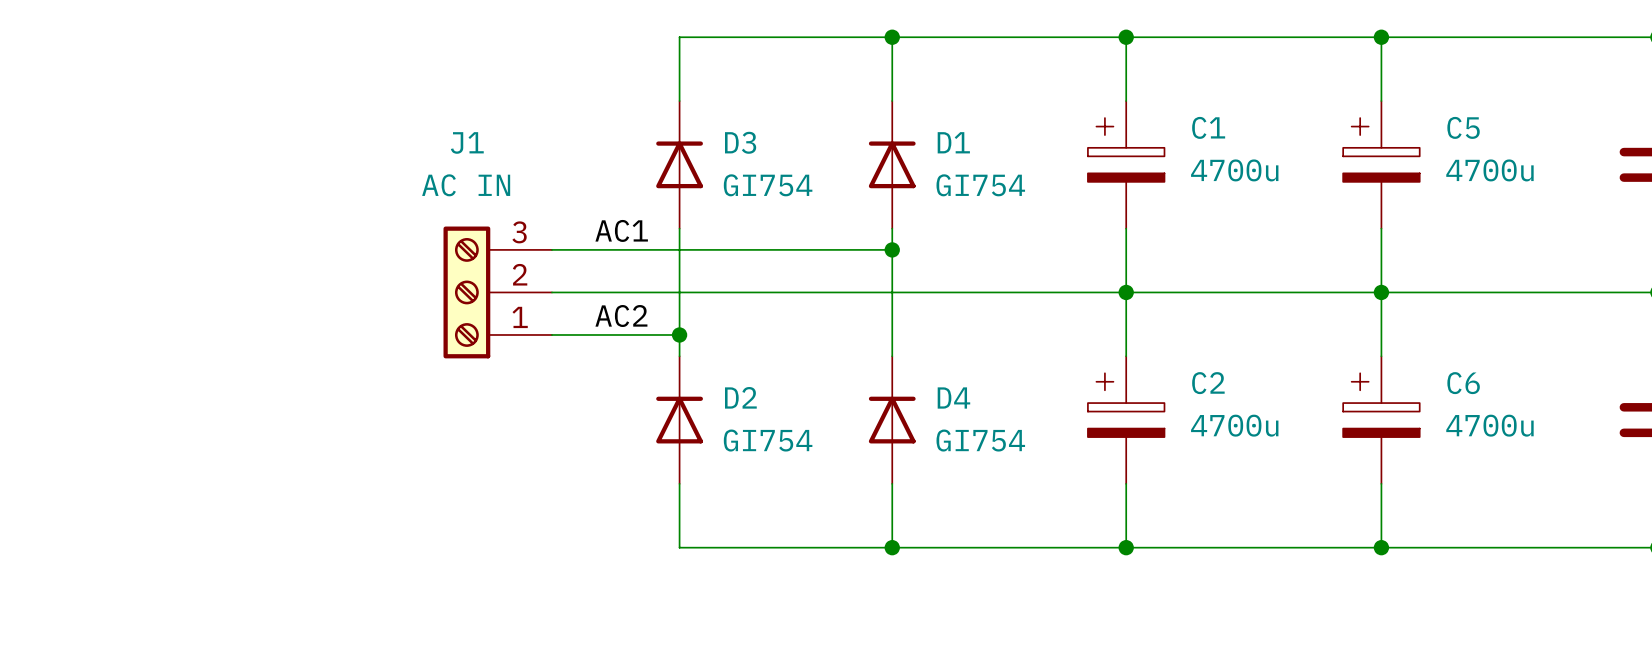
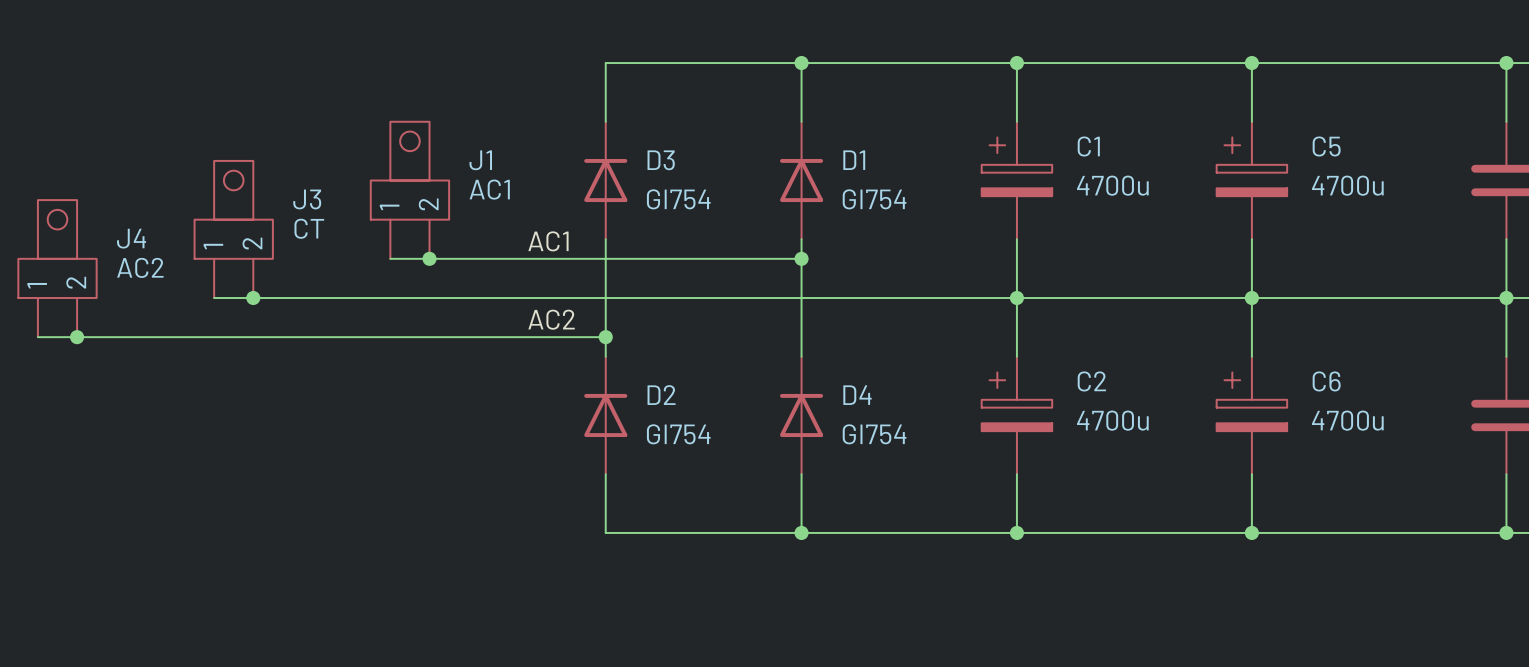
J1 name position: J1 (467, 142) -> J1 (480, 160)
J1 value: AC IN (466, 185) -> AC1 (489, 189)
J3: none -> CT (233, 229)
J1 symbol: [443, 226, 552, 359] -> [370, 121, 450, 259]
junction: none -> (429, 258)
J4: none -> AC2 (57, 268)
wire: none -> (214, 297) (488, 297)
junction: none -> (253, 297)
wire: none -> (37, 337) (488, 337)
junction: none -> (77, 337)

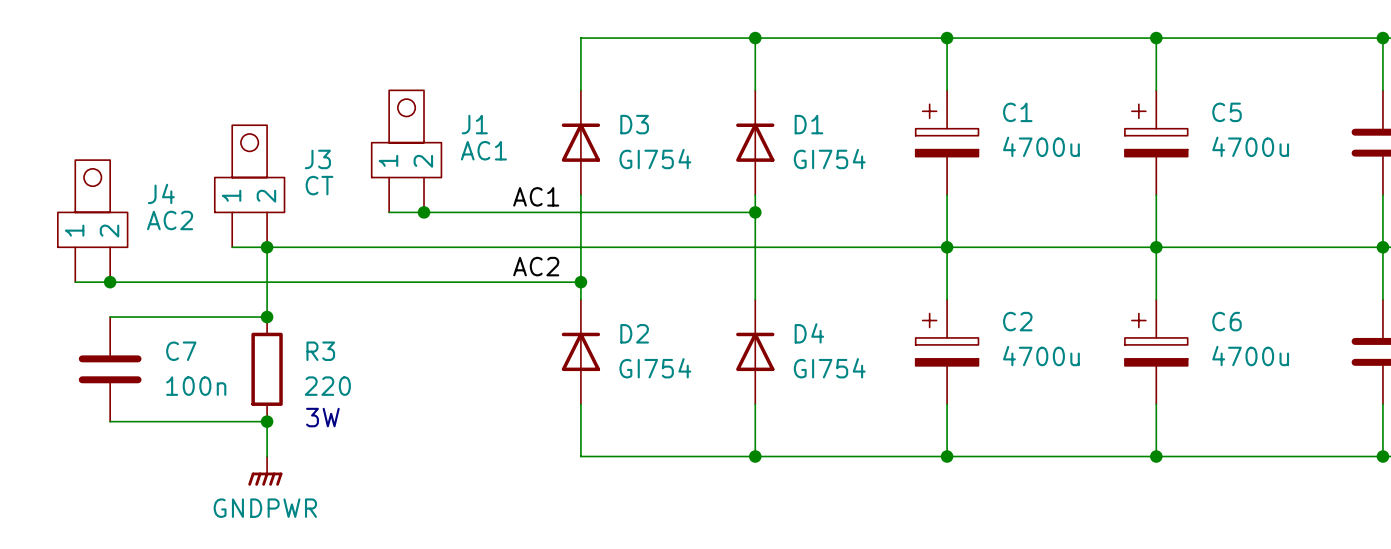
wire: none -> (267, 247) (267, 317) (110, 317)
junction: none -> (267, 317)
C7: none -> 100n (110, 369)
R3: none -> 220 (267, 369)
text: none -> 3W (322, 417)
wire: none -> (110, 421) (267, 421) (267, 456)
junction: none -> (267, 421)
power symbol: none -> GNDPWR (265, 471)

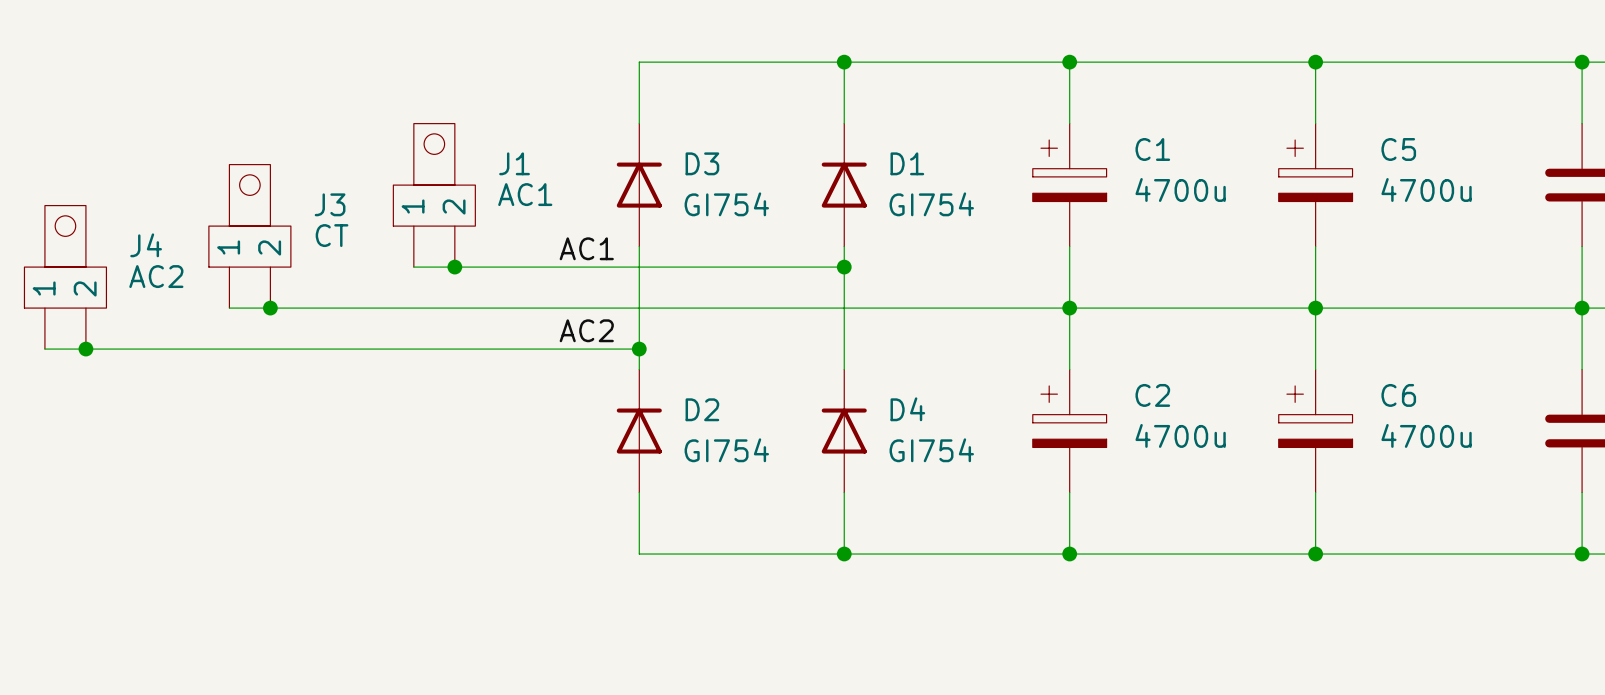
wire: (267, 247) (267, 317) (110, 317) -> none
junction: (267, 317) -> none
C7: 100n (110, 369) -> none
R3: 220 (267, 369) -> none
text: 3W (322, 417) -> none
wire: (110, 421) (267, 421) (267, 456) -> none
junction: (267, 421) -> none
power symbol: GNDPWR (265, 471) -> none

